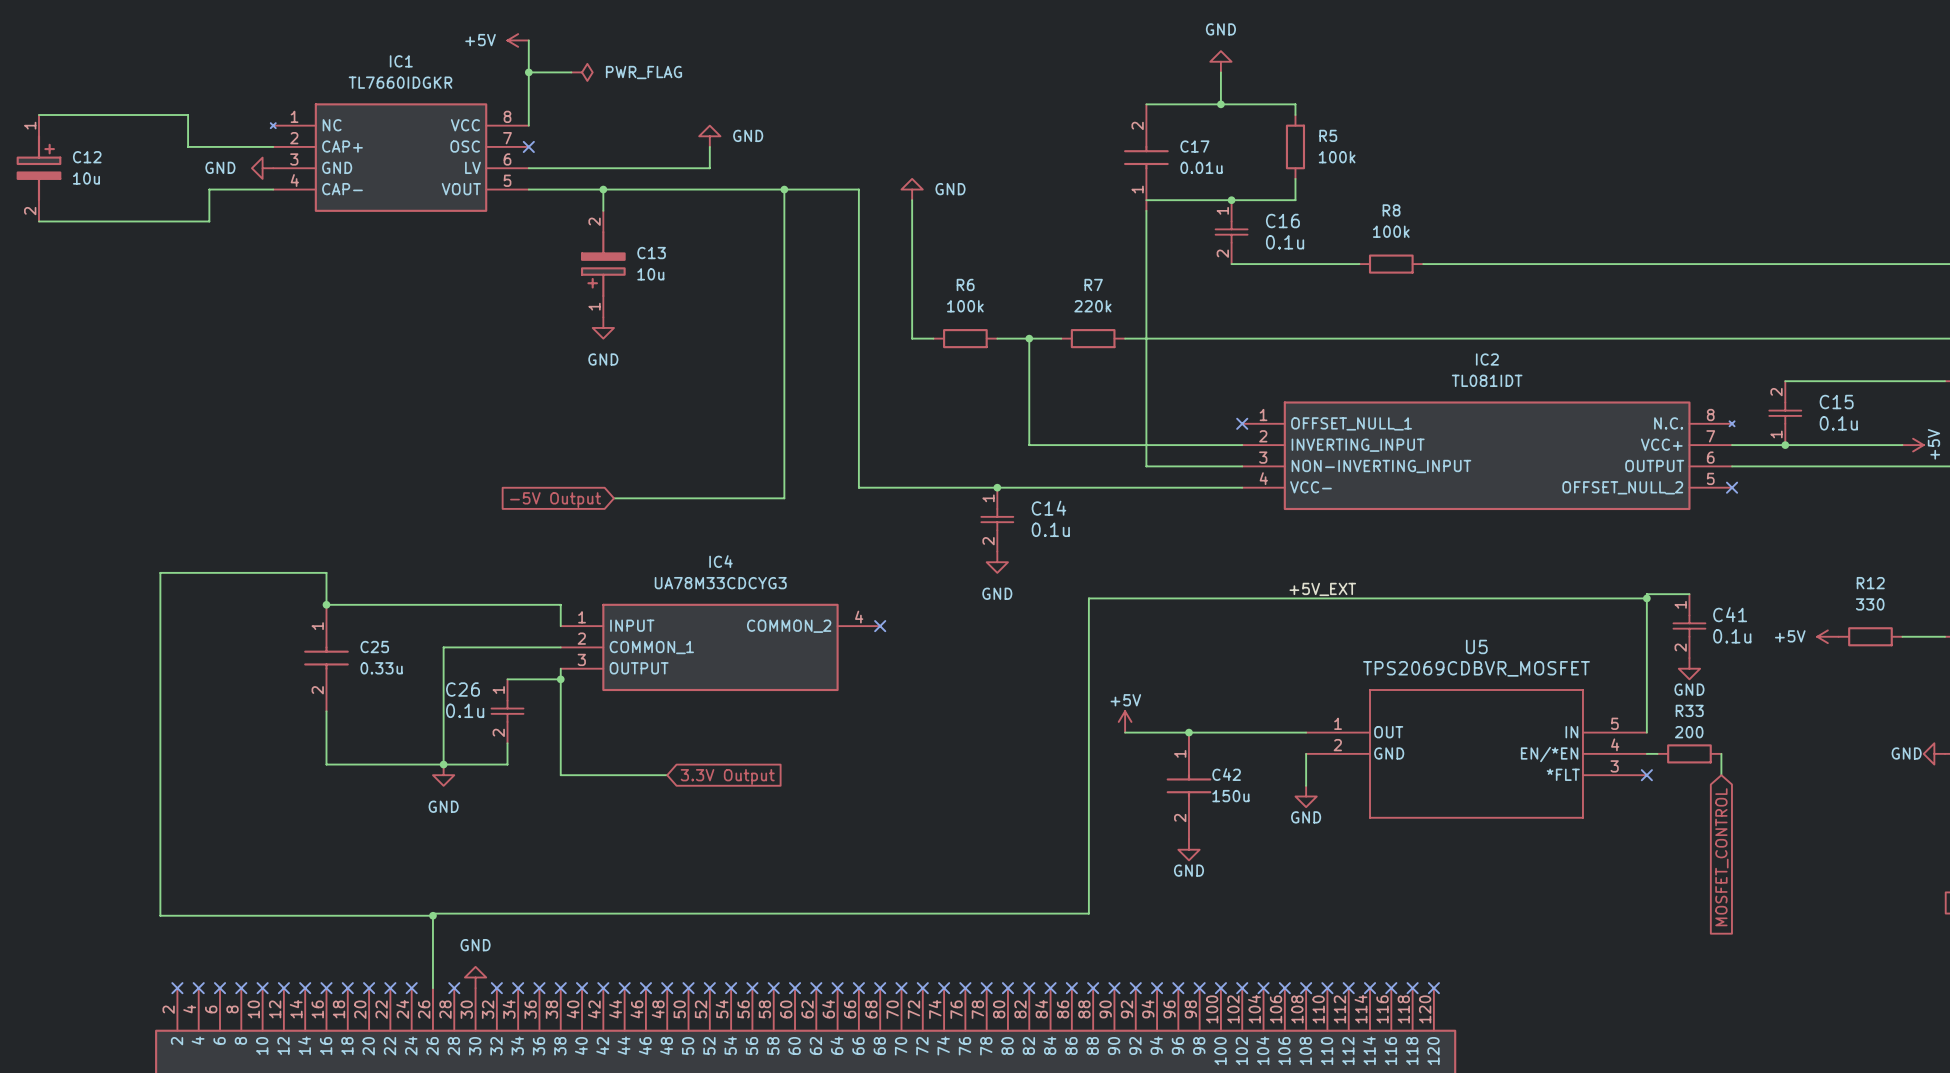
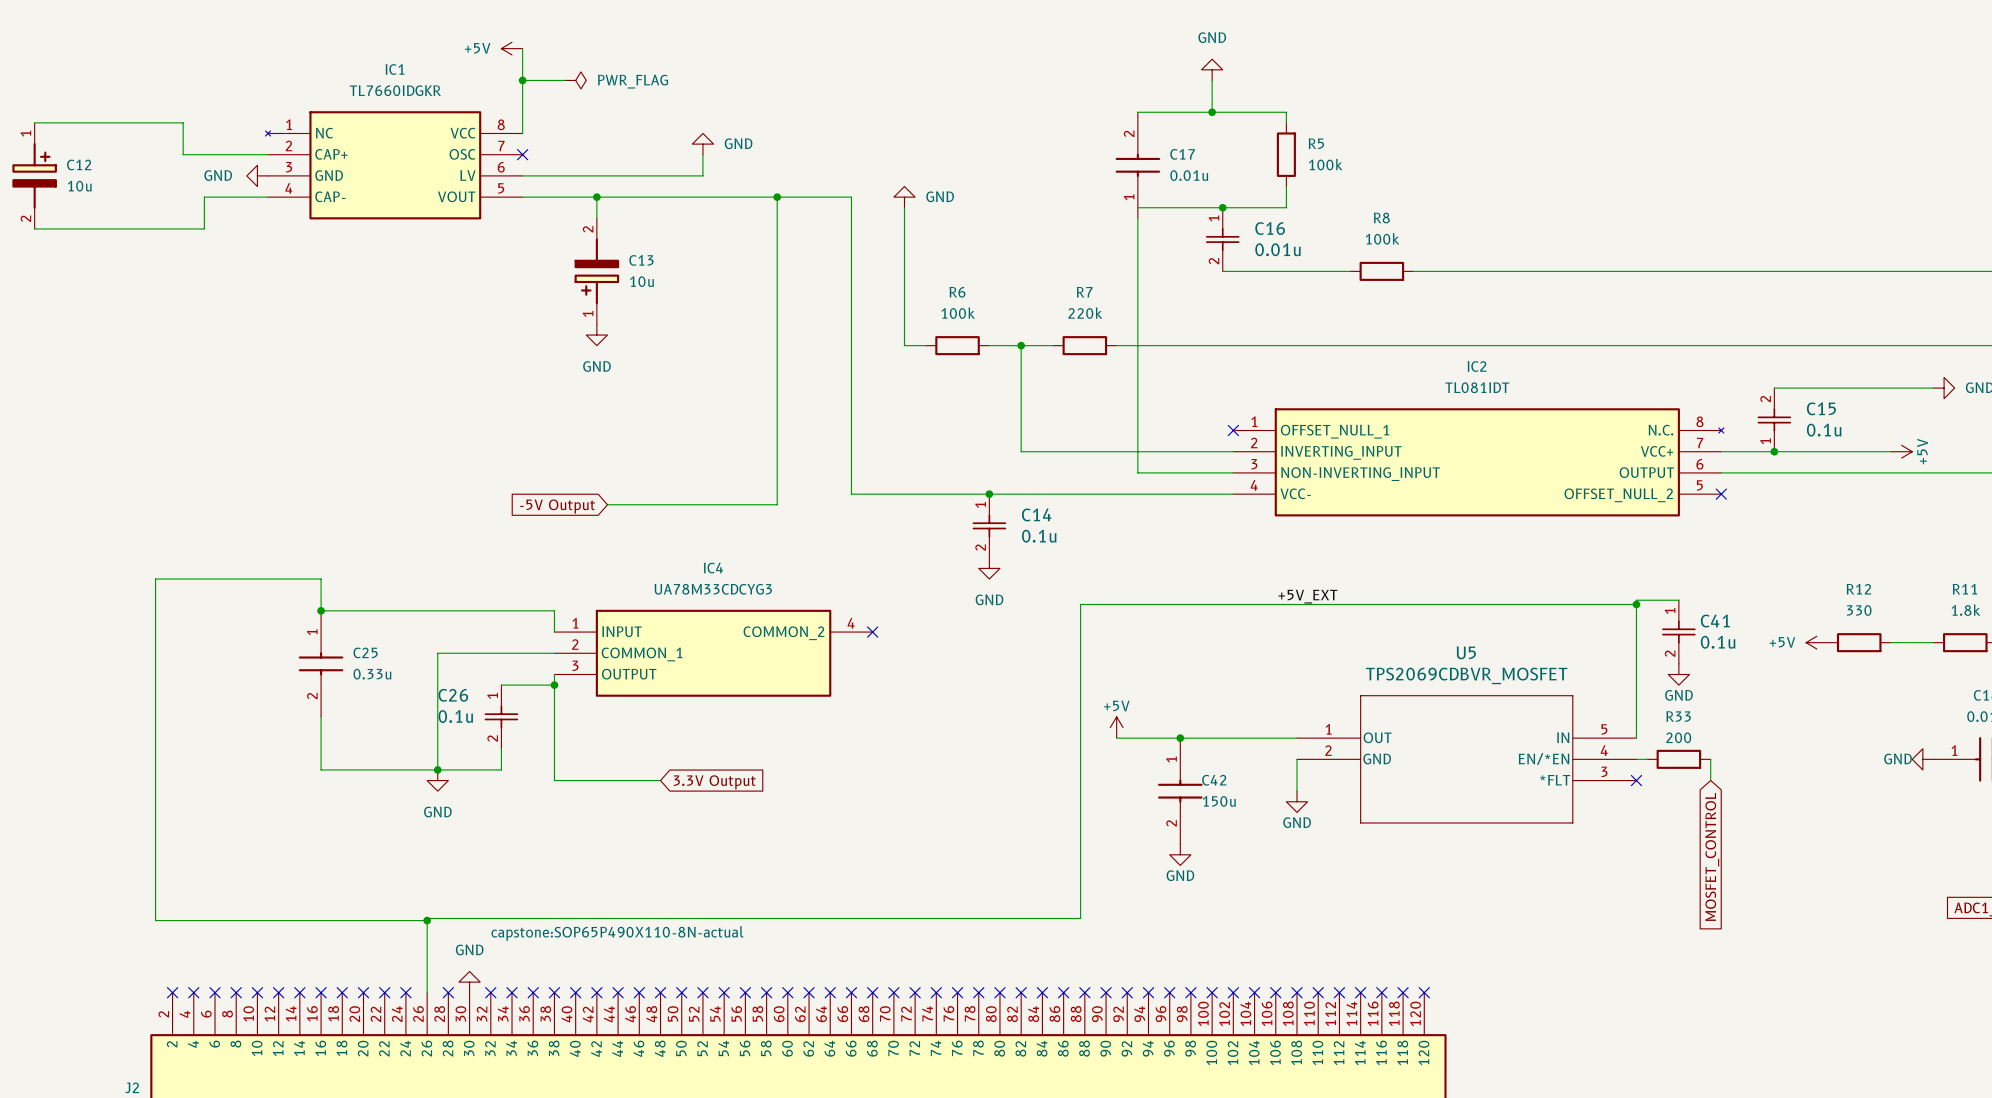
C16 value: 0.1u (1285, 242) -> 0.01u (1277, 249)
IC1 text: none -> capstone:SOP65P490X110-8N-actual (617, 933)

